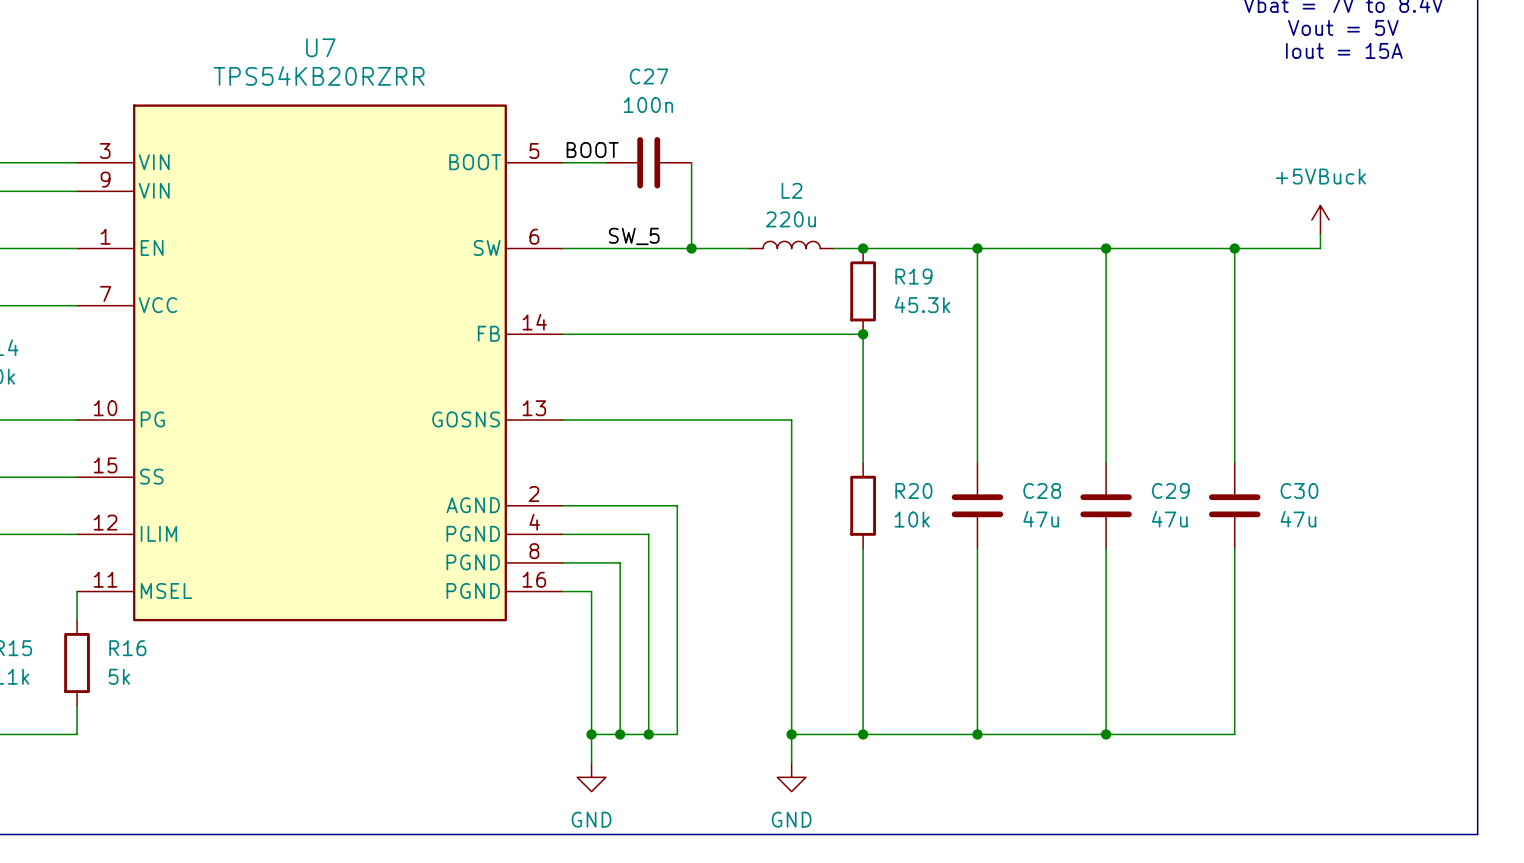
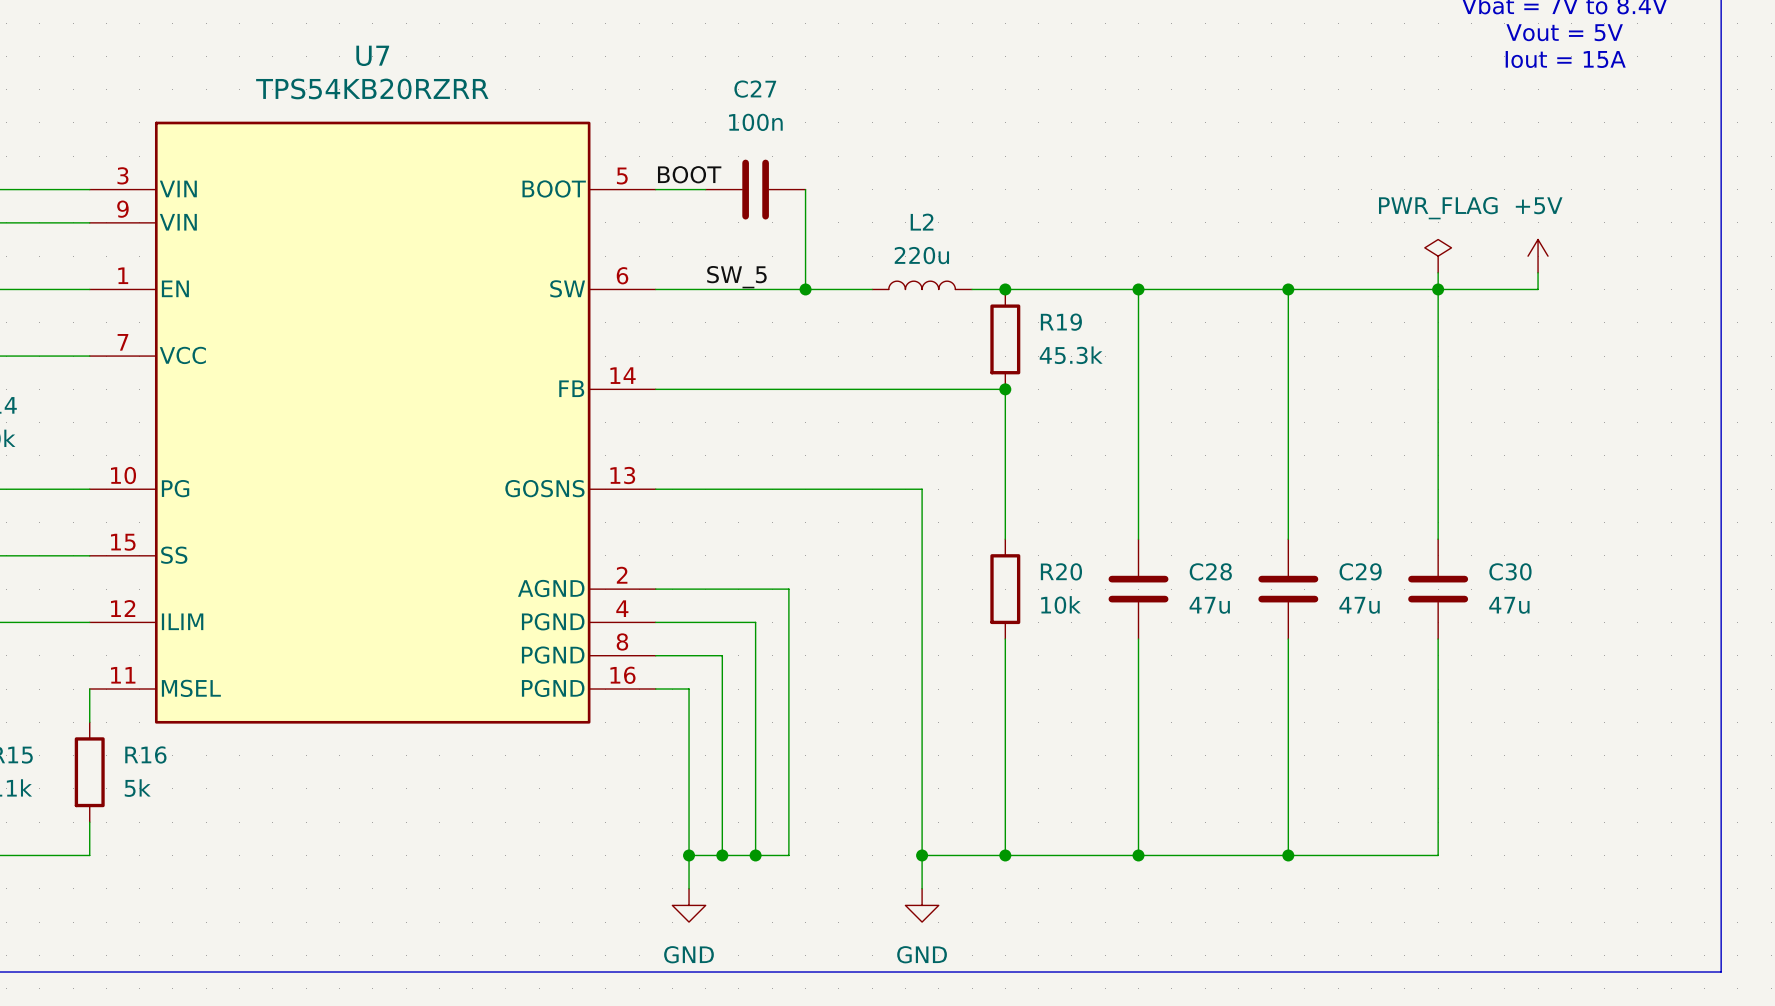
power symbol: none -> PWR_FLAG (1438, 256)
power symbol: +5VBuck (1320, 219) -> +5V (1538, 256)
wire: none -> (1438, 272) (1438, 289)

